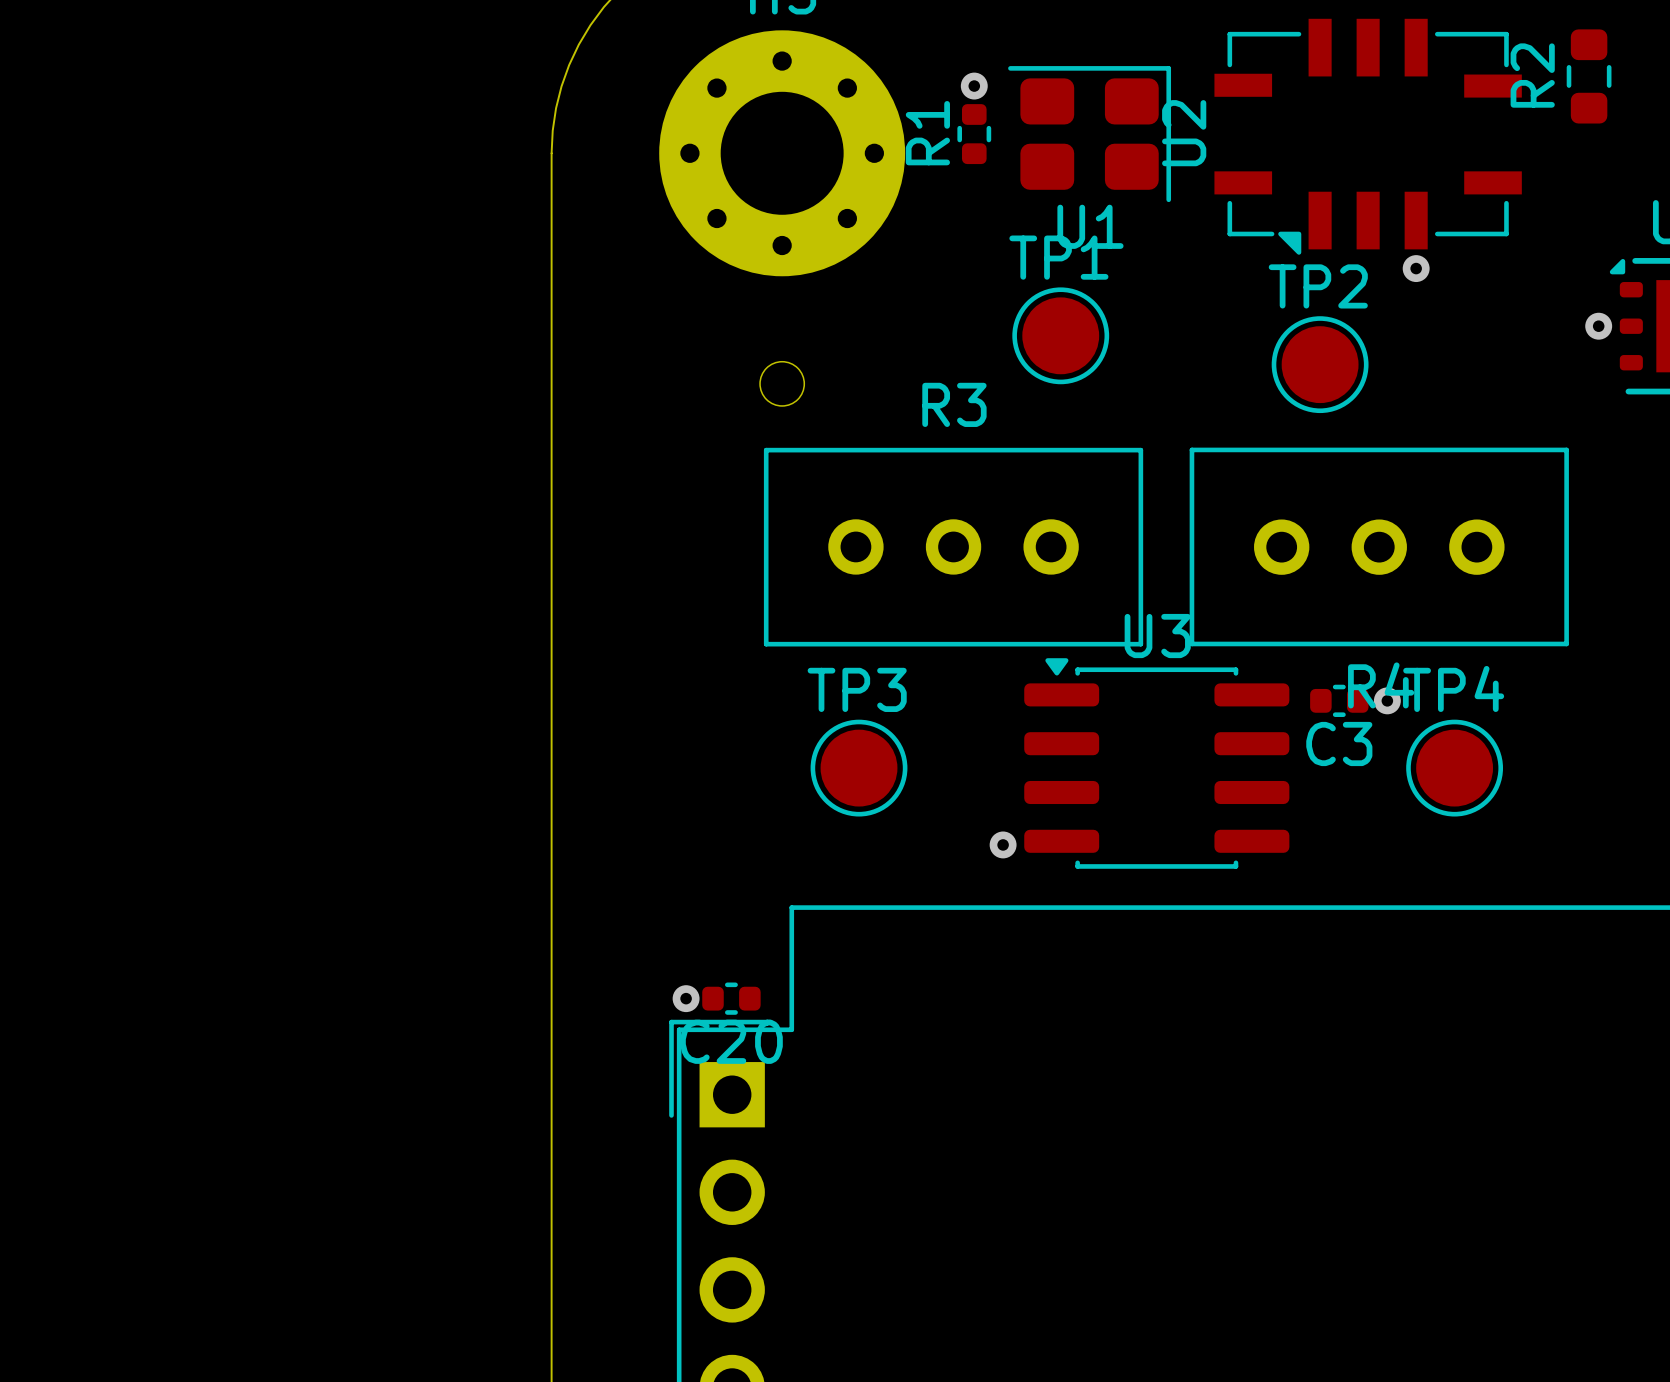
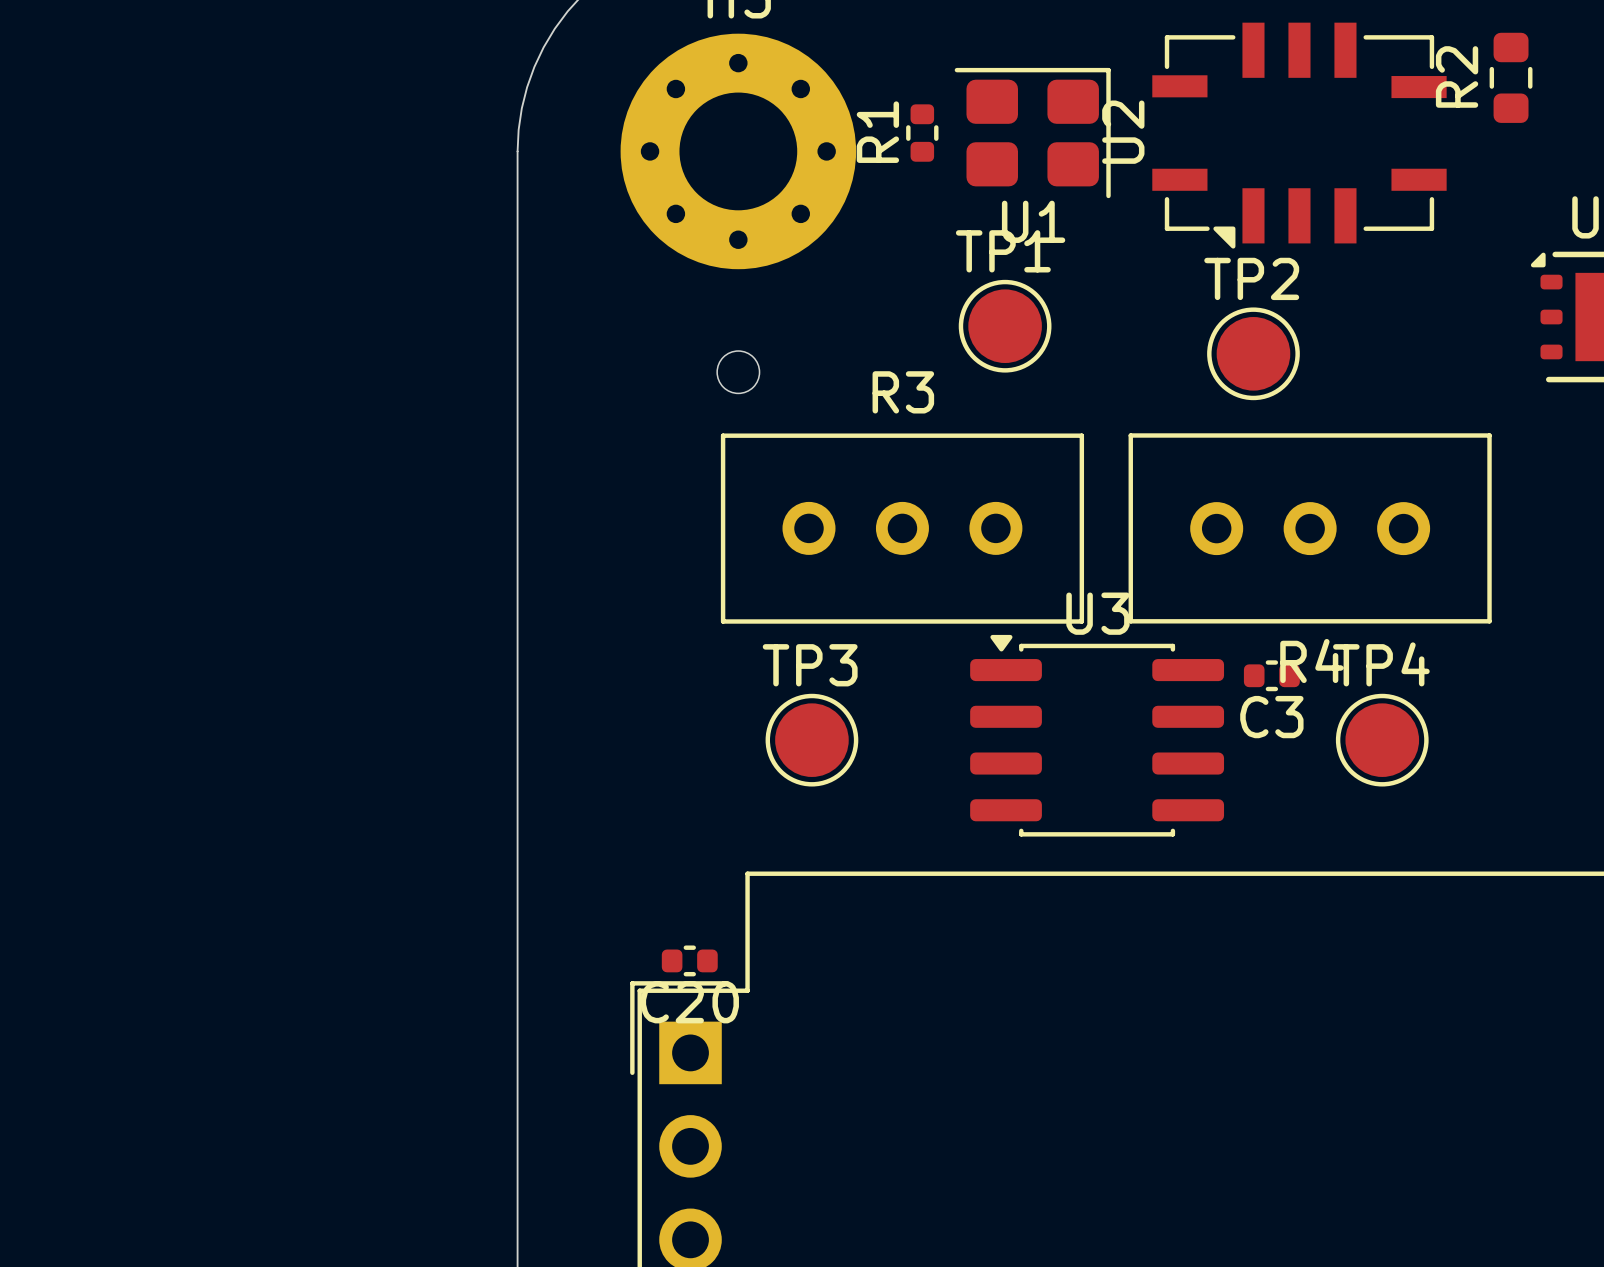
via: (974, 86) -> none
via: (1416, 268) -> none
via: (1598, 326) -> none
via: (1387, 700) -> none
via: (1003, 844) -> none
via: (686, 998) -> none

